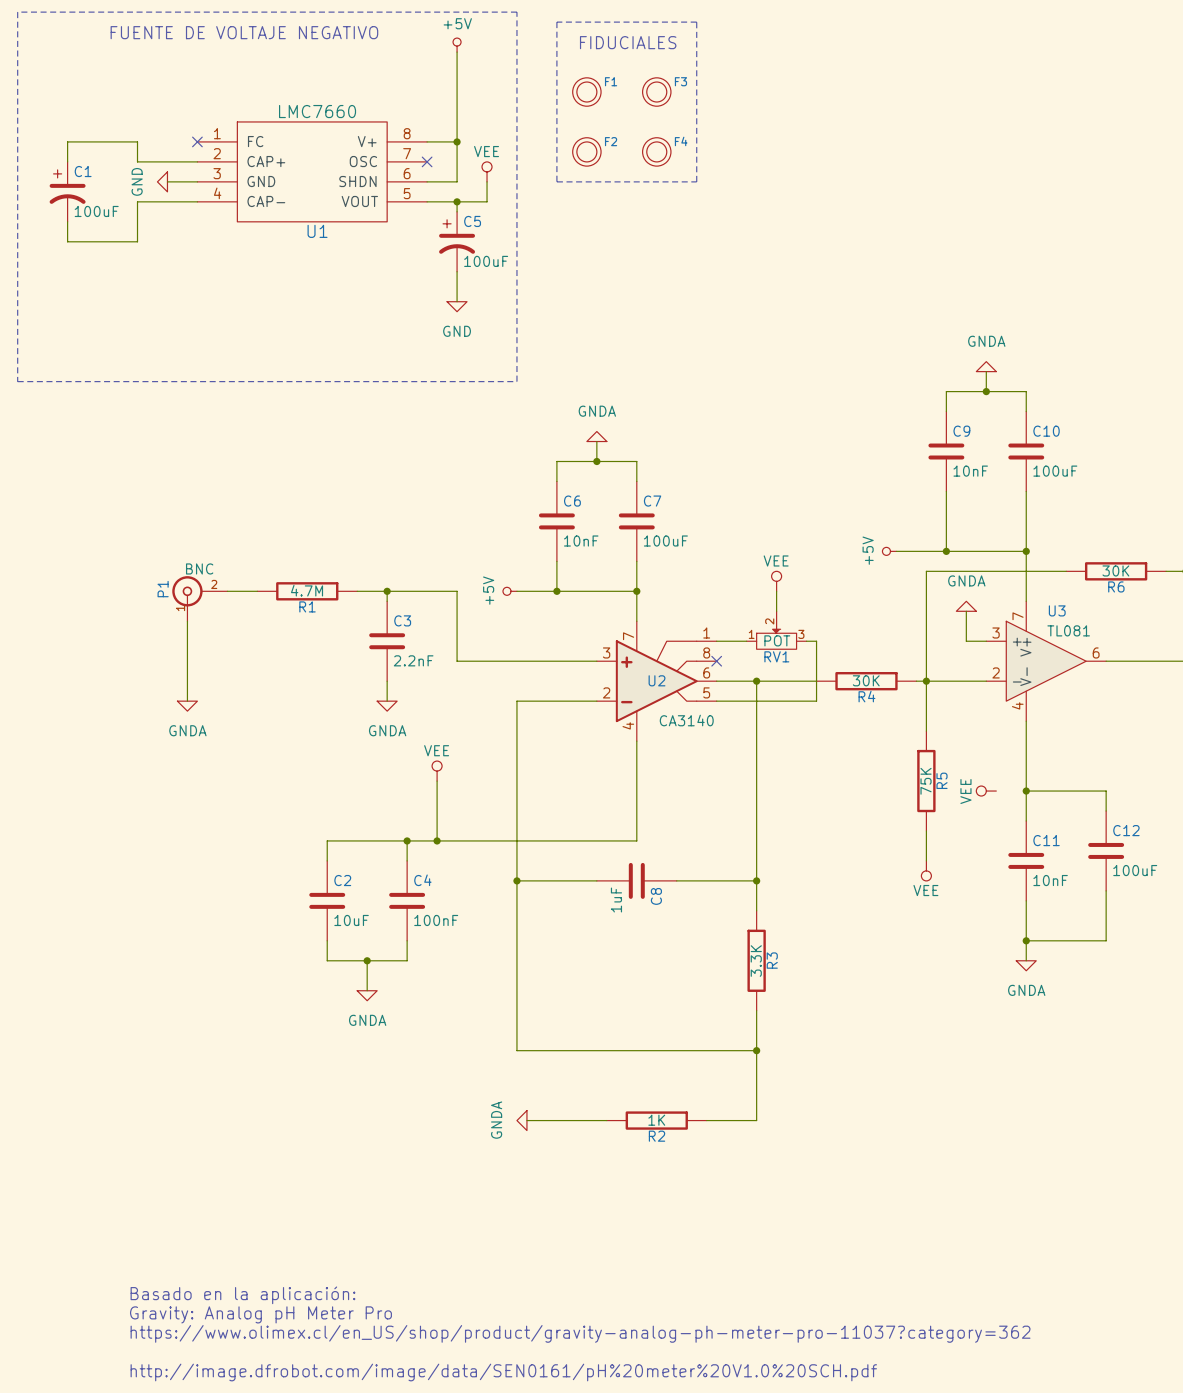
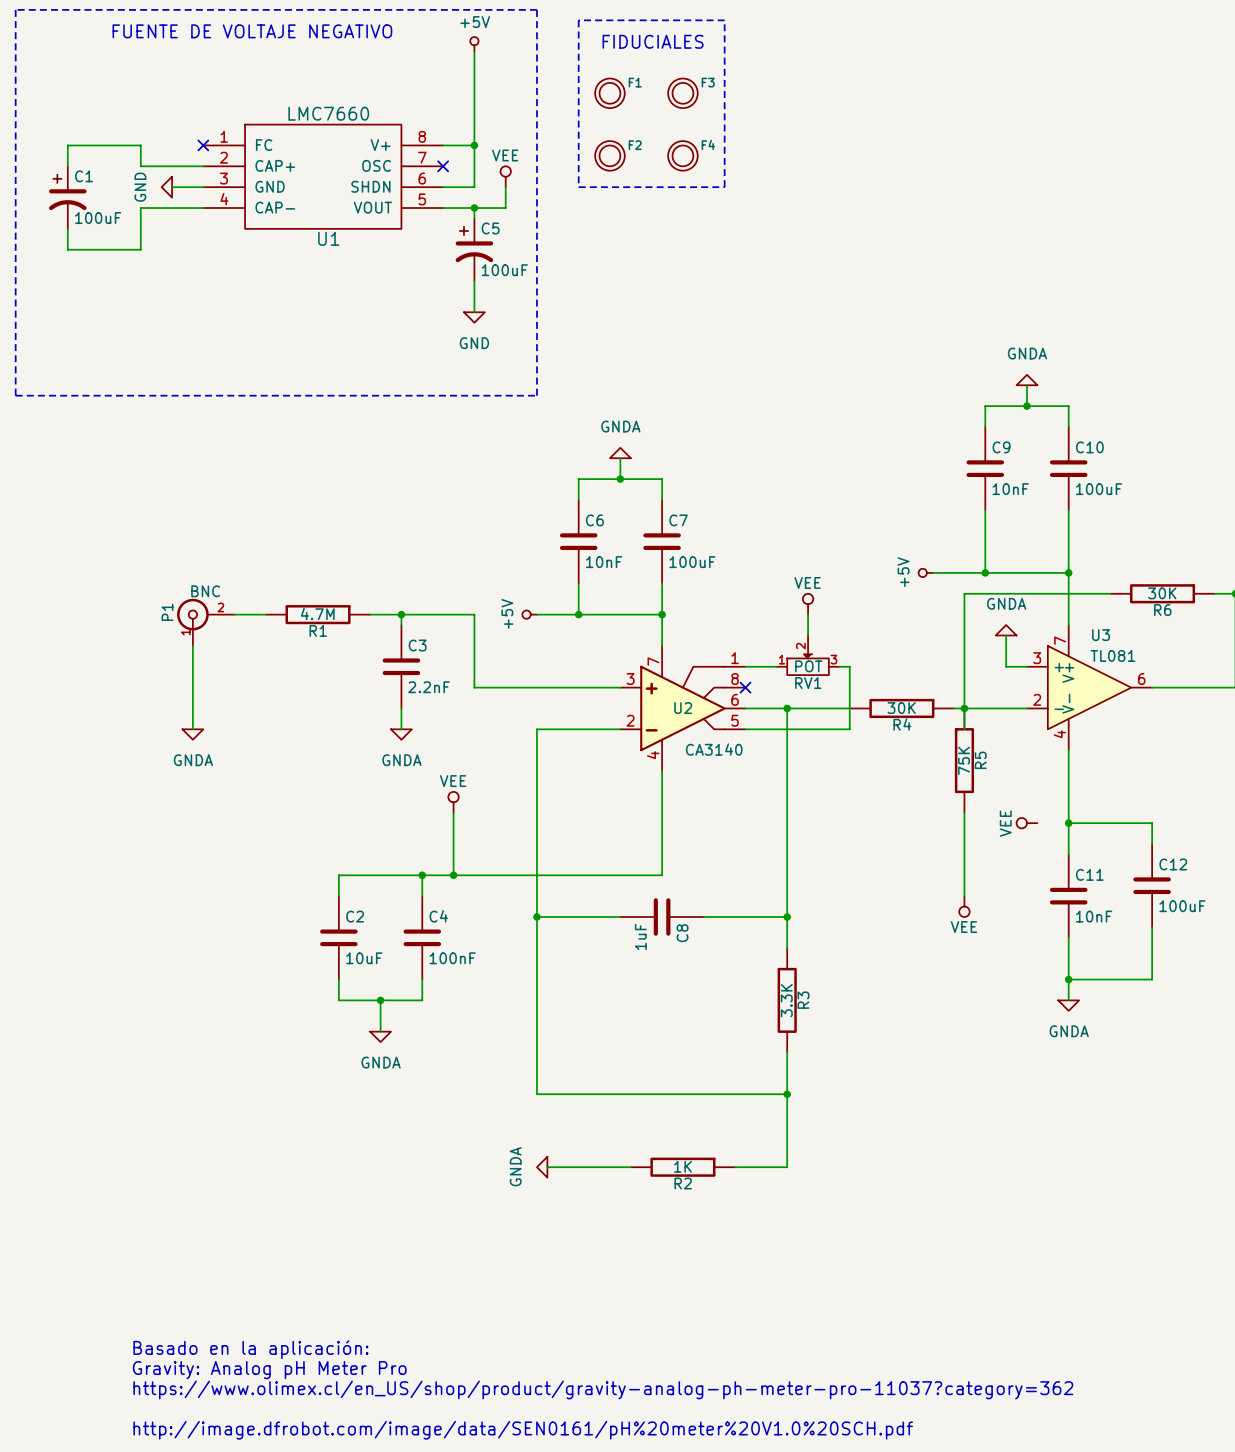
wire: (926, 701) (926, 731) -> none
wire: none -> (964, 812) (964, 864)
R5 position: (926, 781) -> (964, 760)

